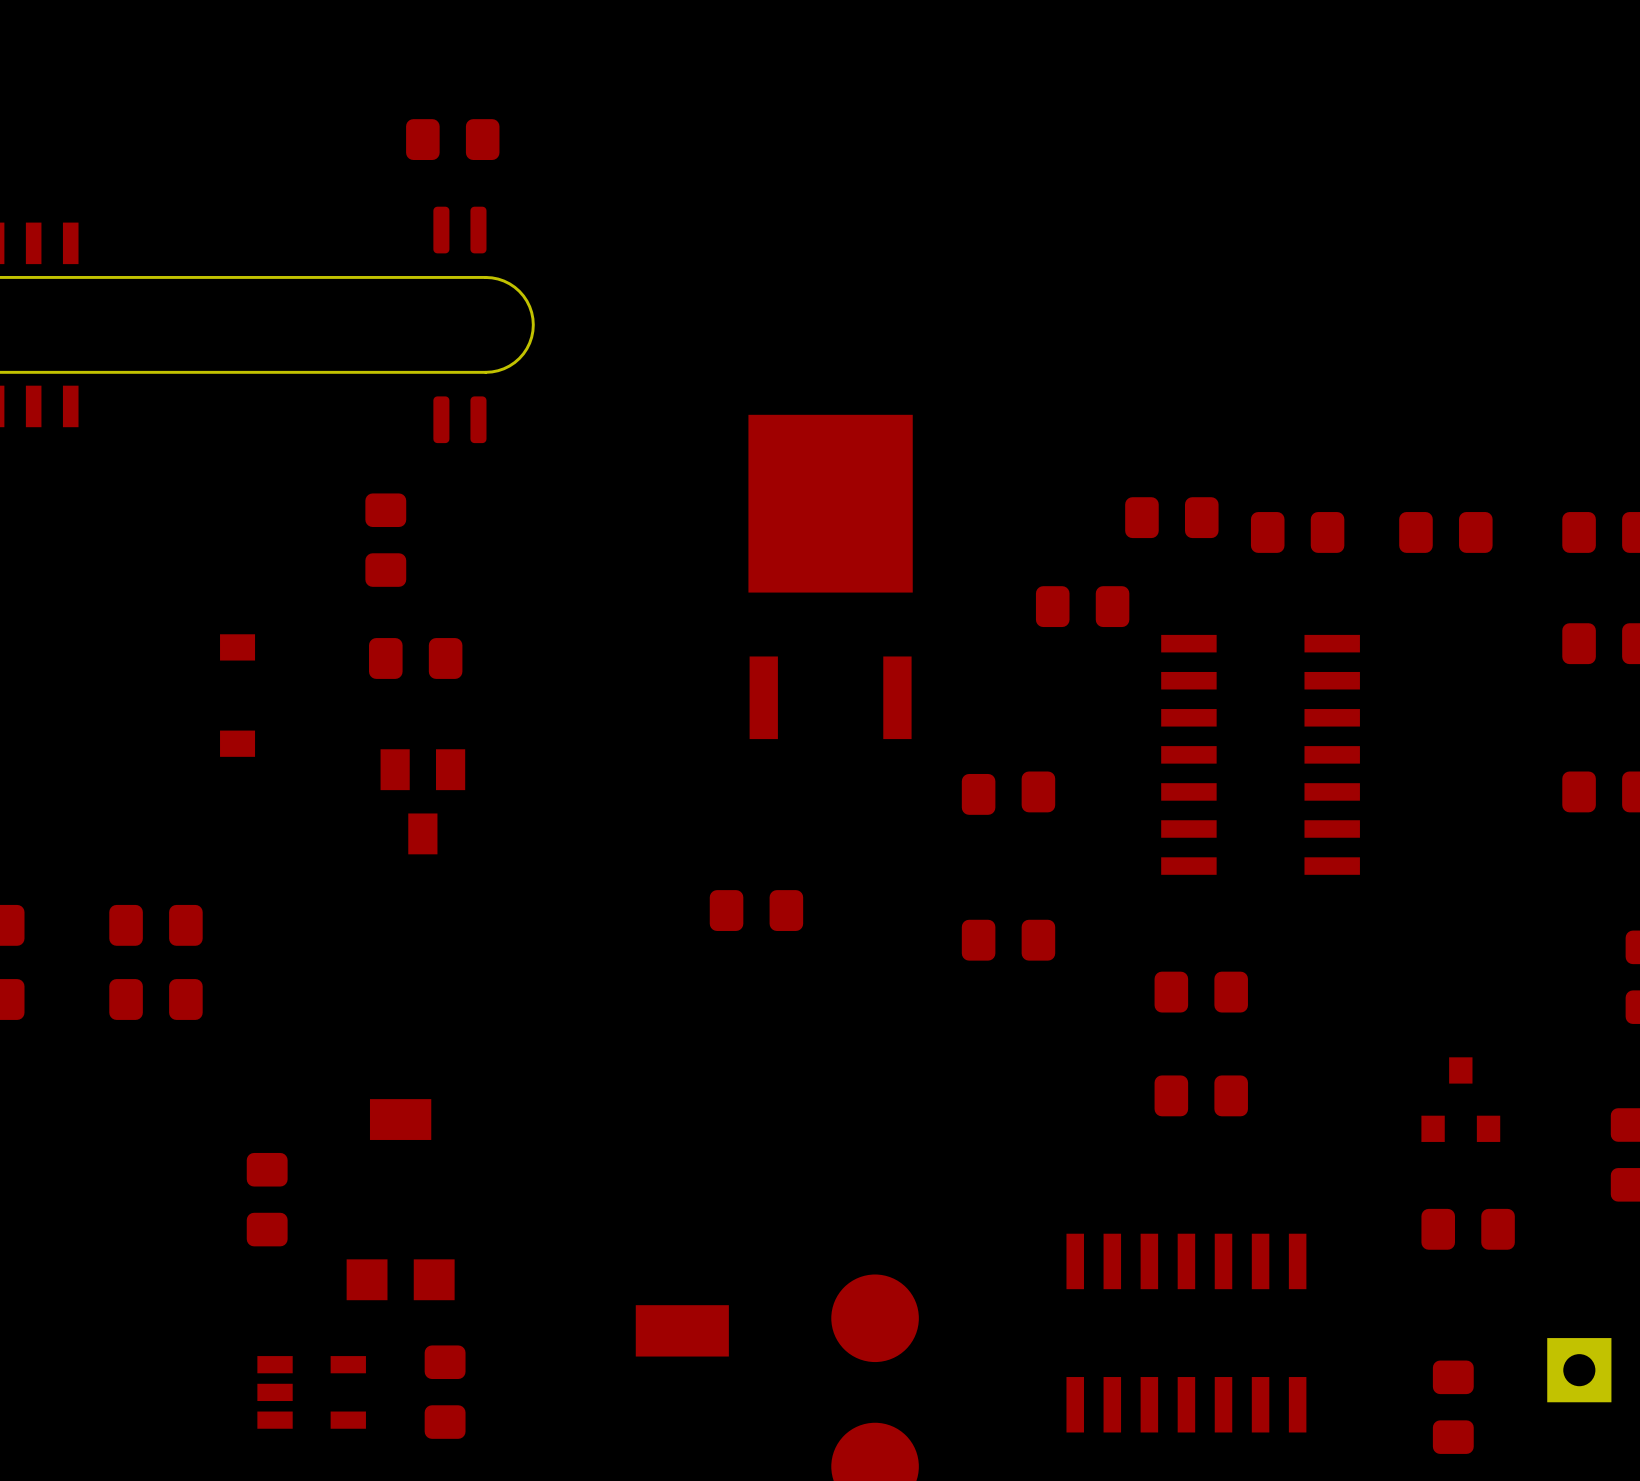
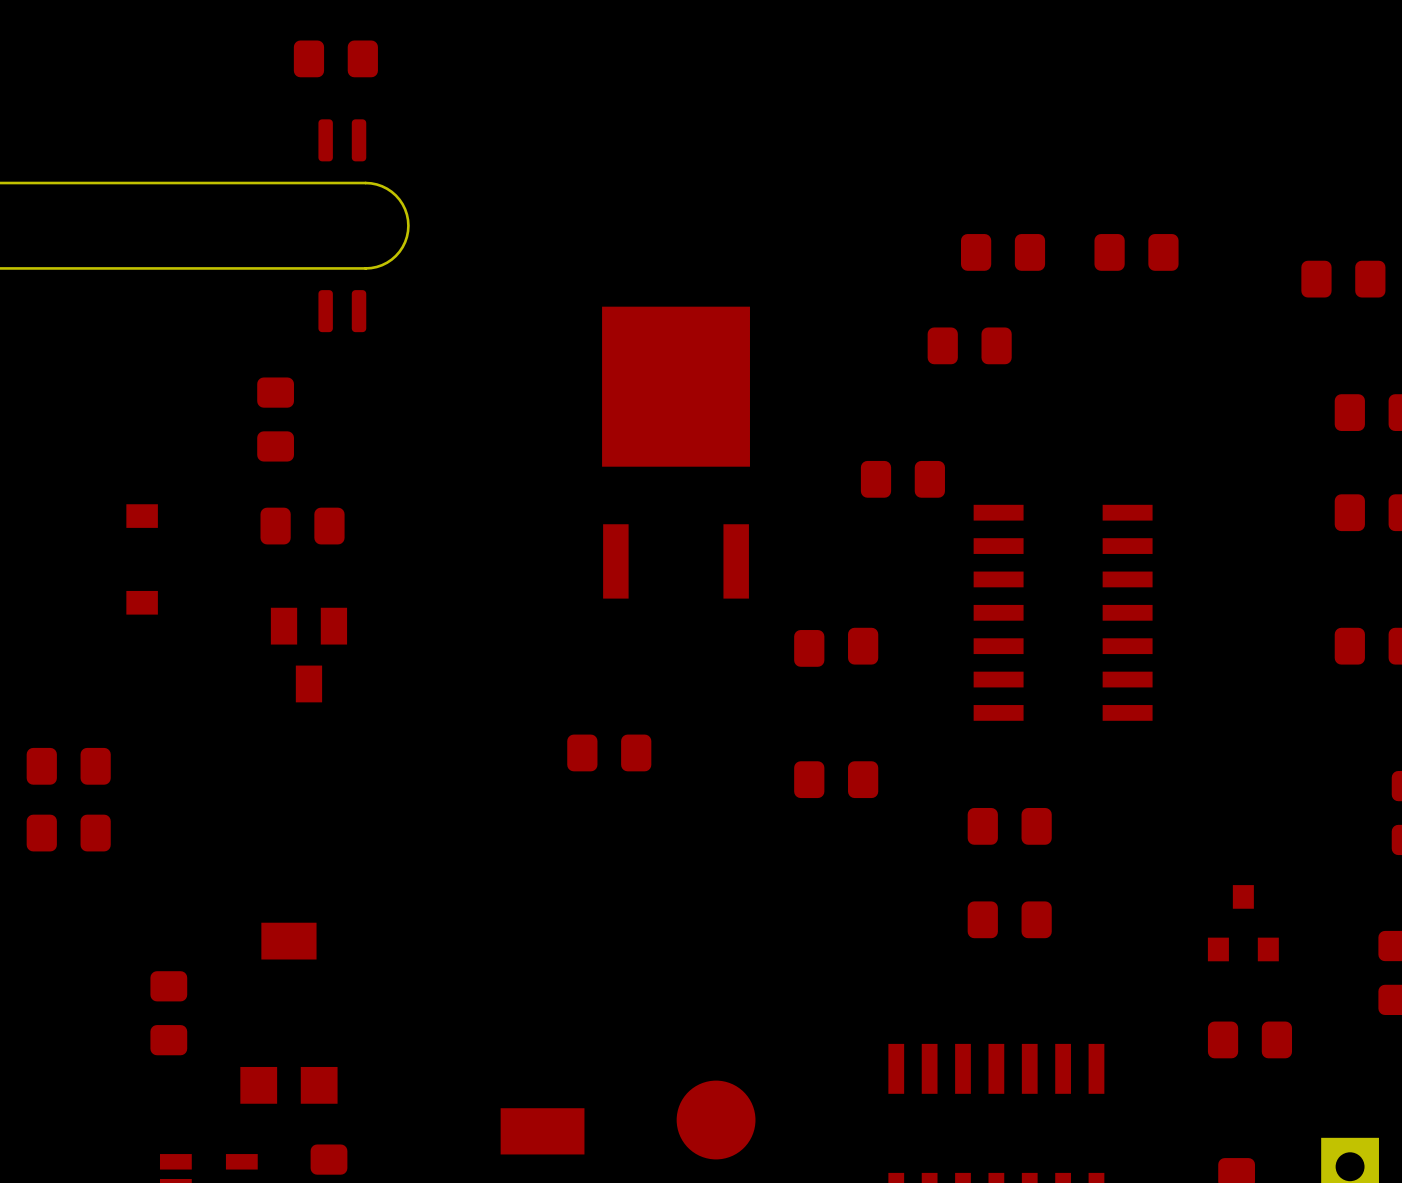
part: none -> (1003, 252)
part: none -> (1136, 252)
part: none -> (1343, 279)
part position: (1171, 517) -> (969, 345)
part: (1297, 532) -> none
part: (1445, 532) -> none

